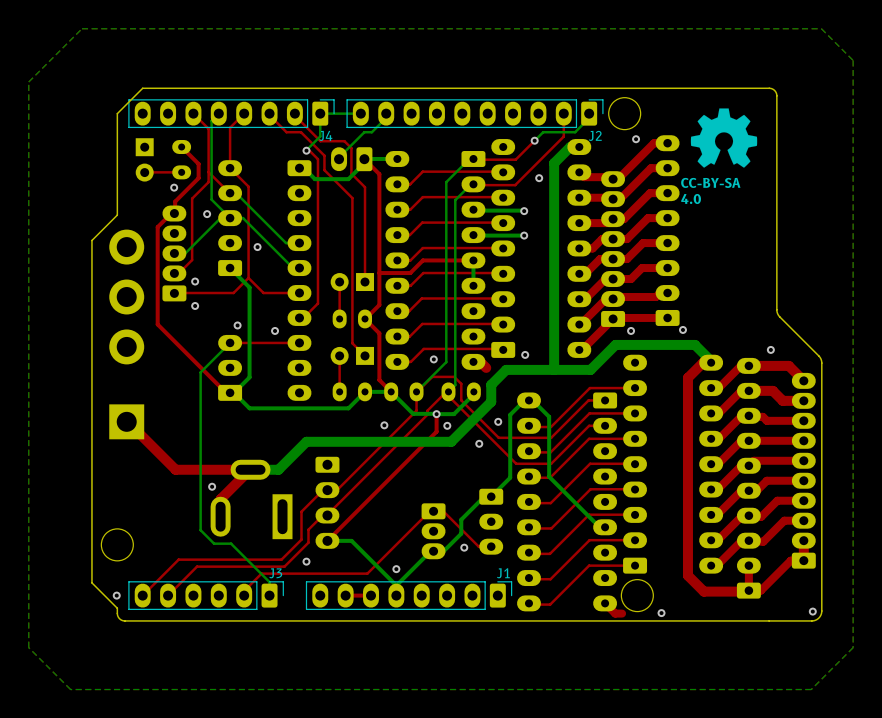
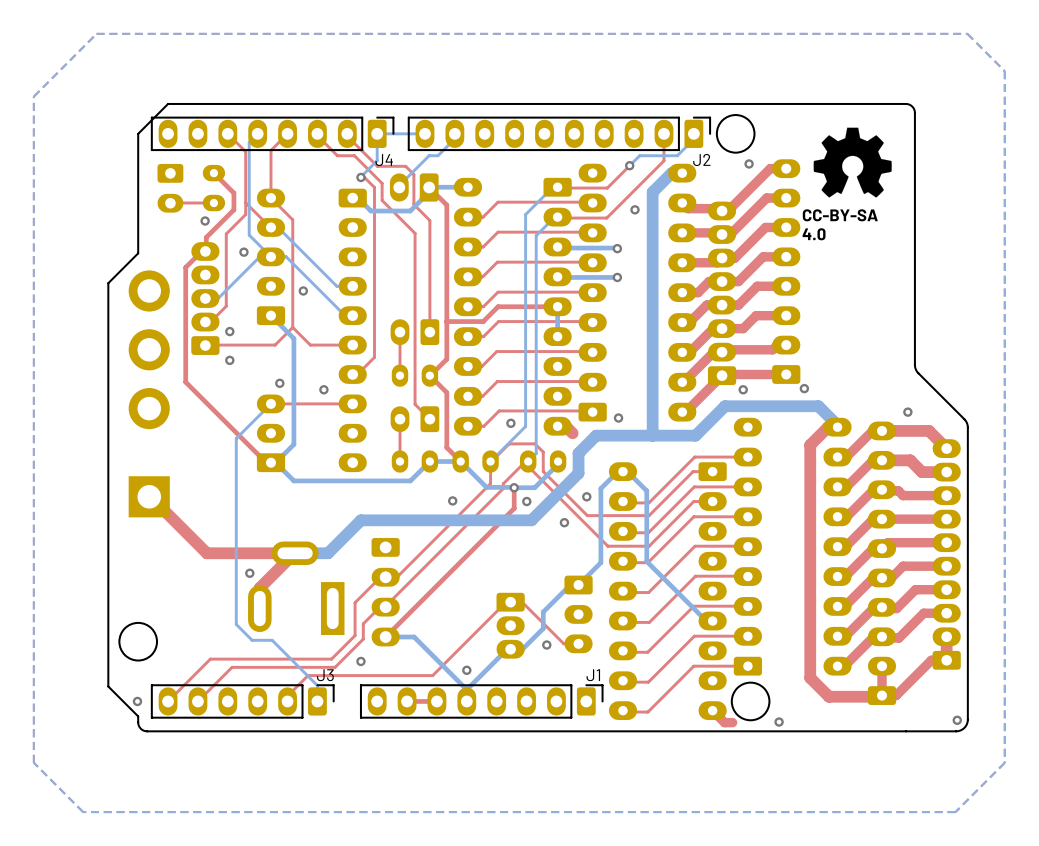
part footprint: [135, 138, 154, 182] -> [157, 163, 184, 213]
part footprint: [330, 273, 375, 292] -> [390, 319, 440, 346]
part footprint: [330, 346, 375, 365] -> [390, 406, 440, 433]

